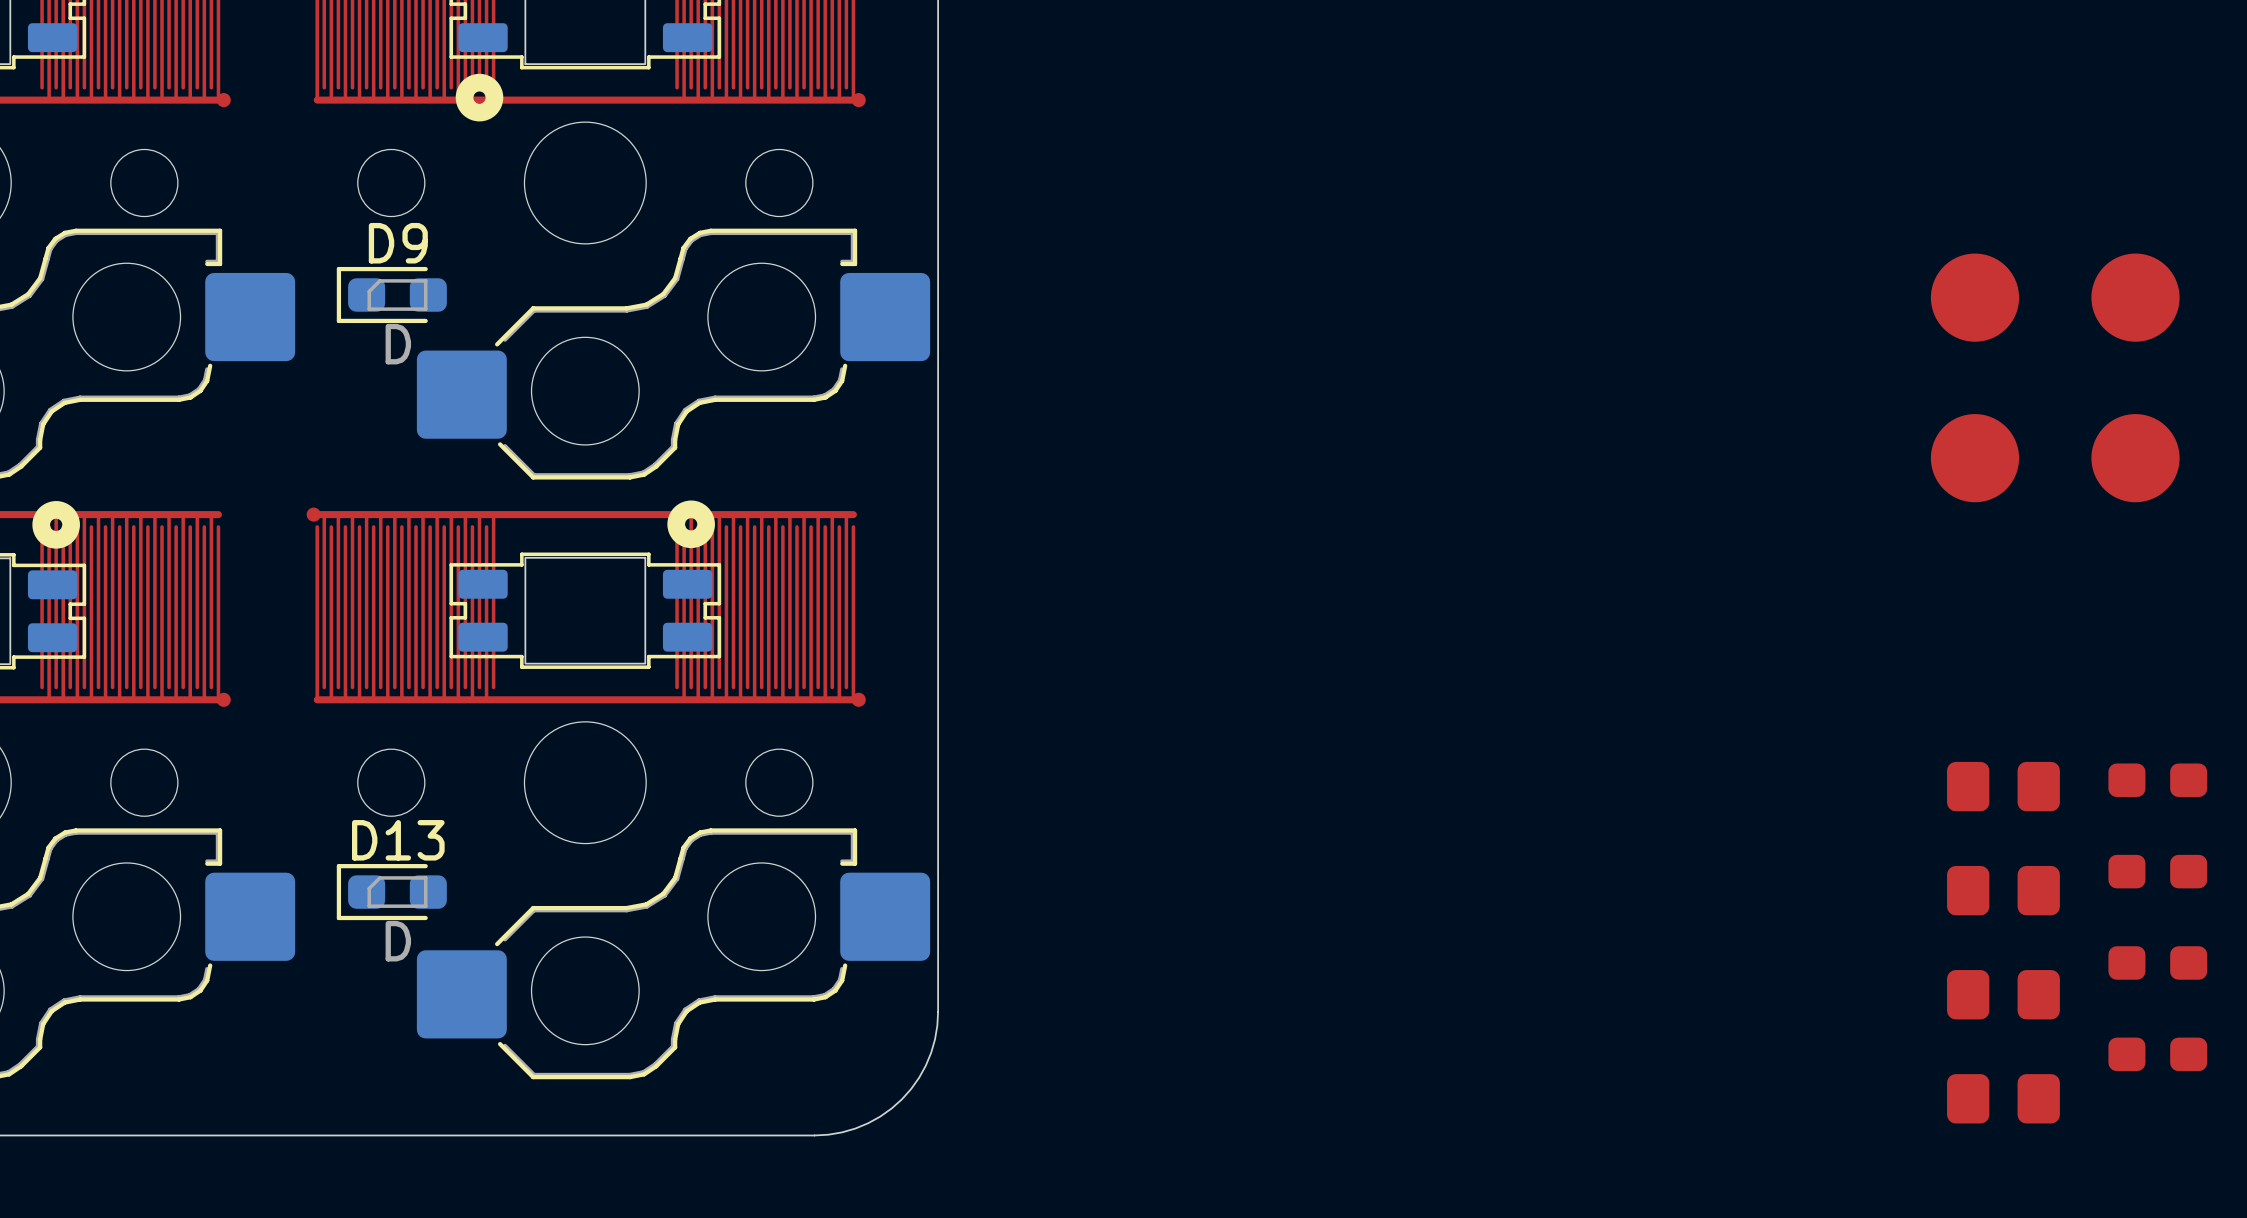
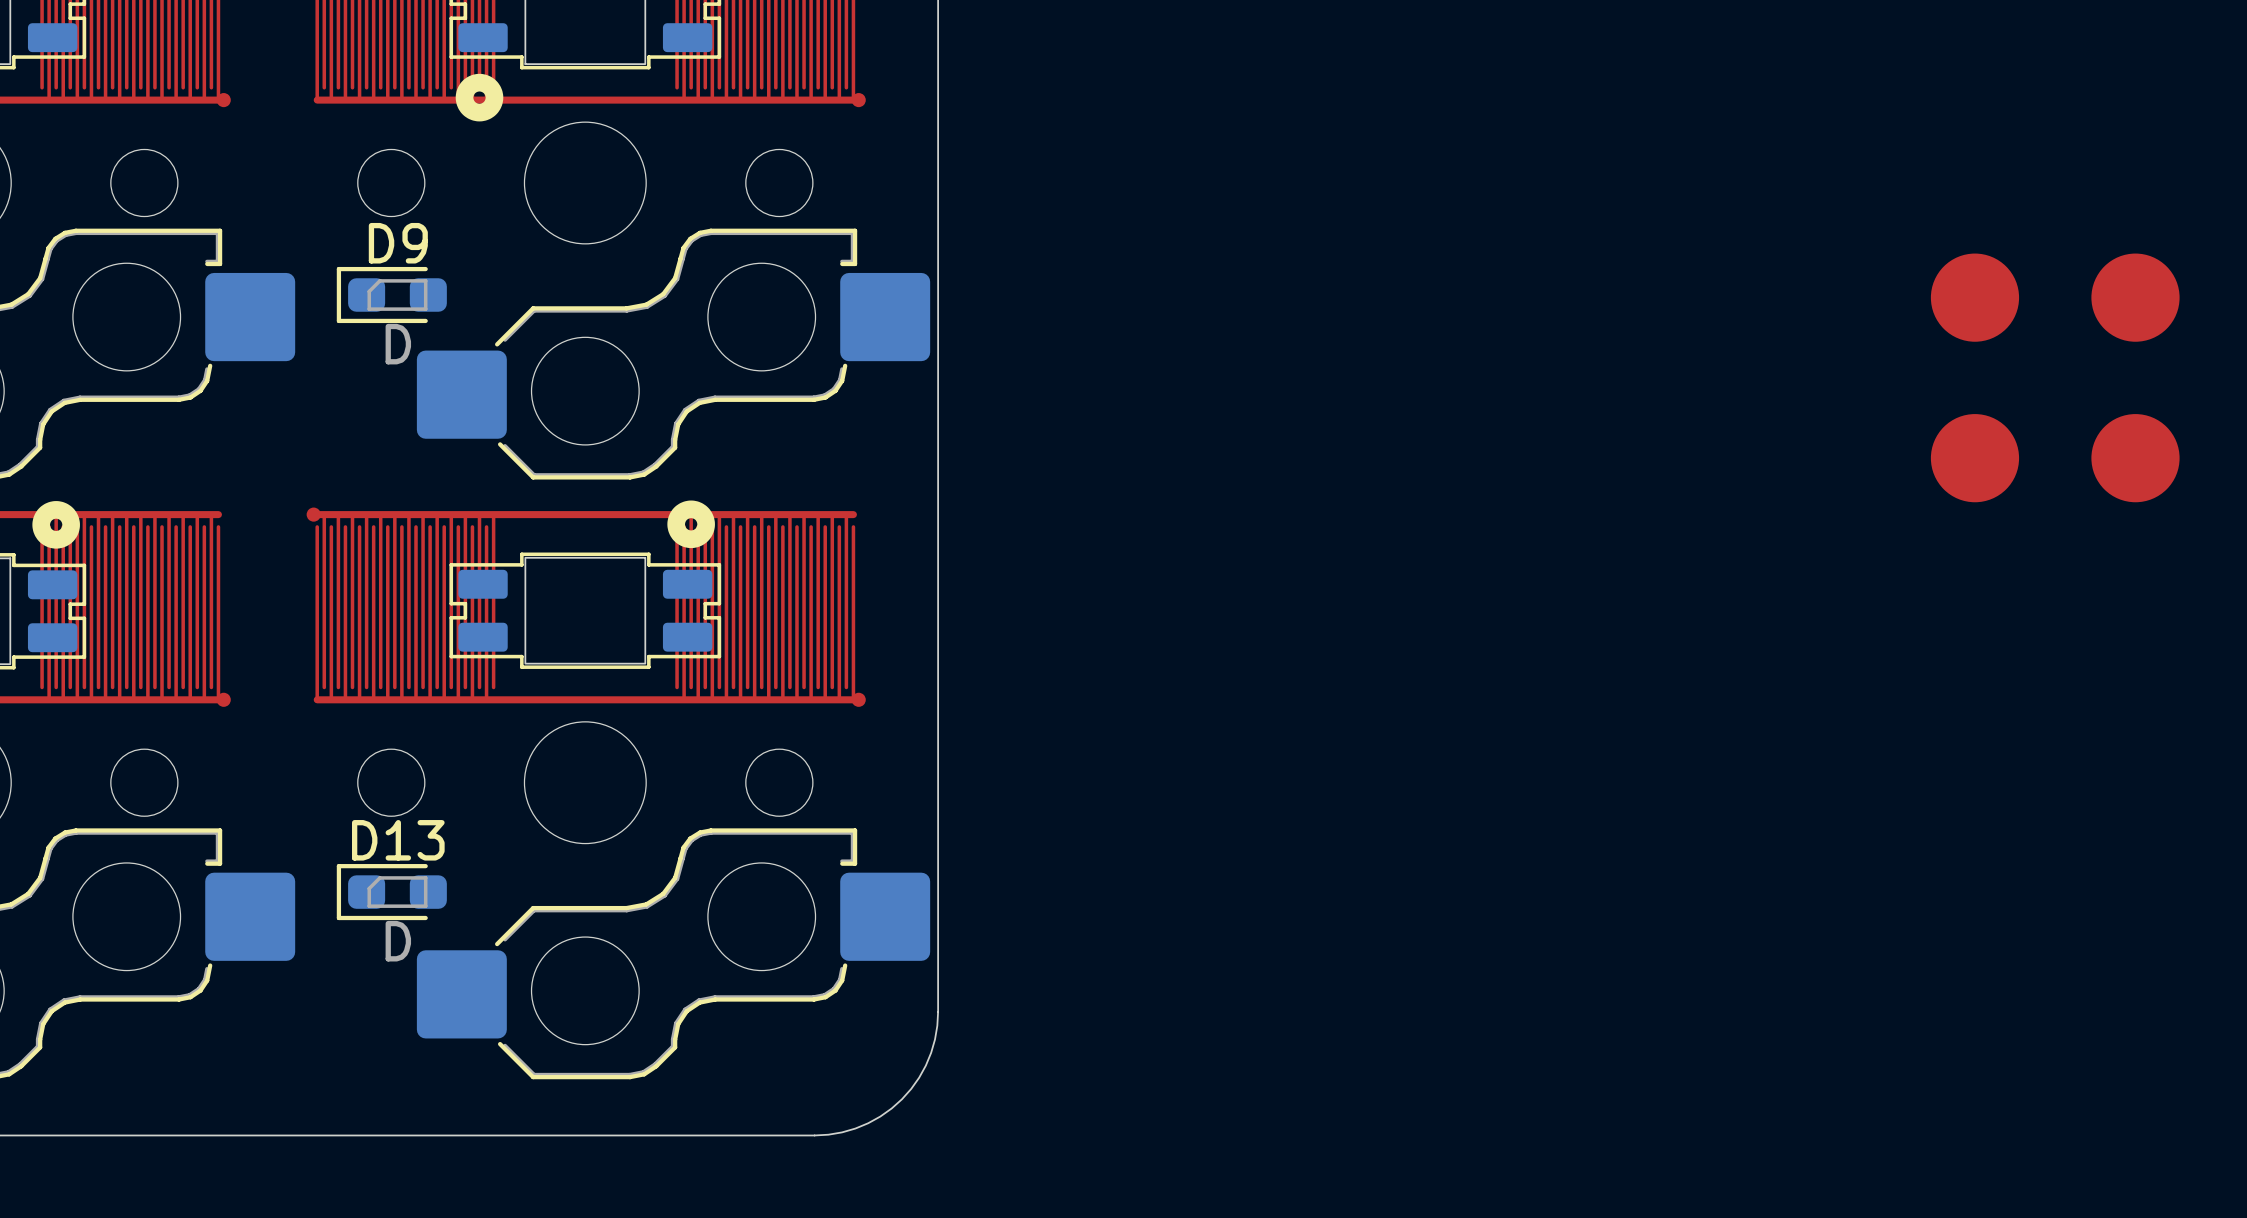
part: (2157, 780) -> none
part: (2003, 786) -> none
part: (2157, 871) -> none
part: (2003, 890) -> none
part: (2157, 962) -> none
part: (2003, 994) -> none
part: (2157, 1054) -> none
part: (2003, 1098) -> none

